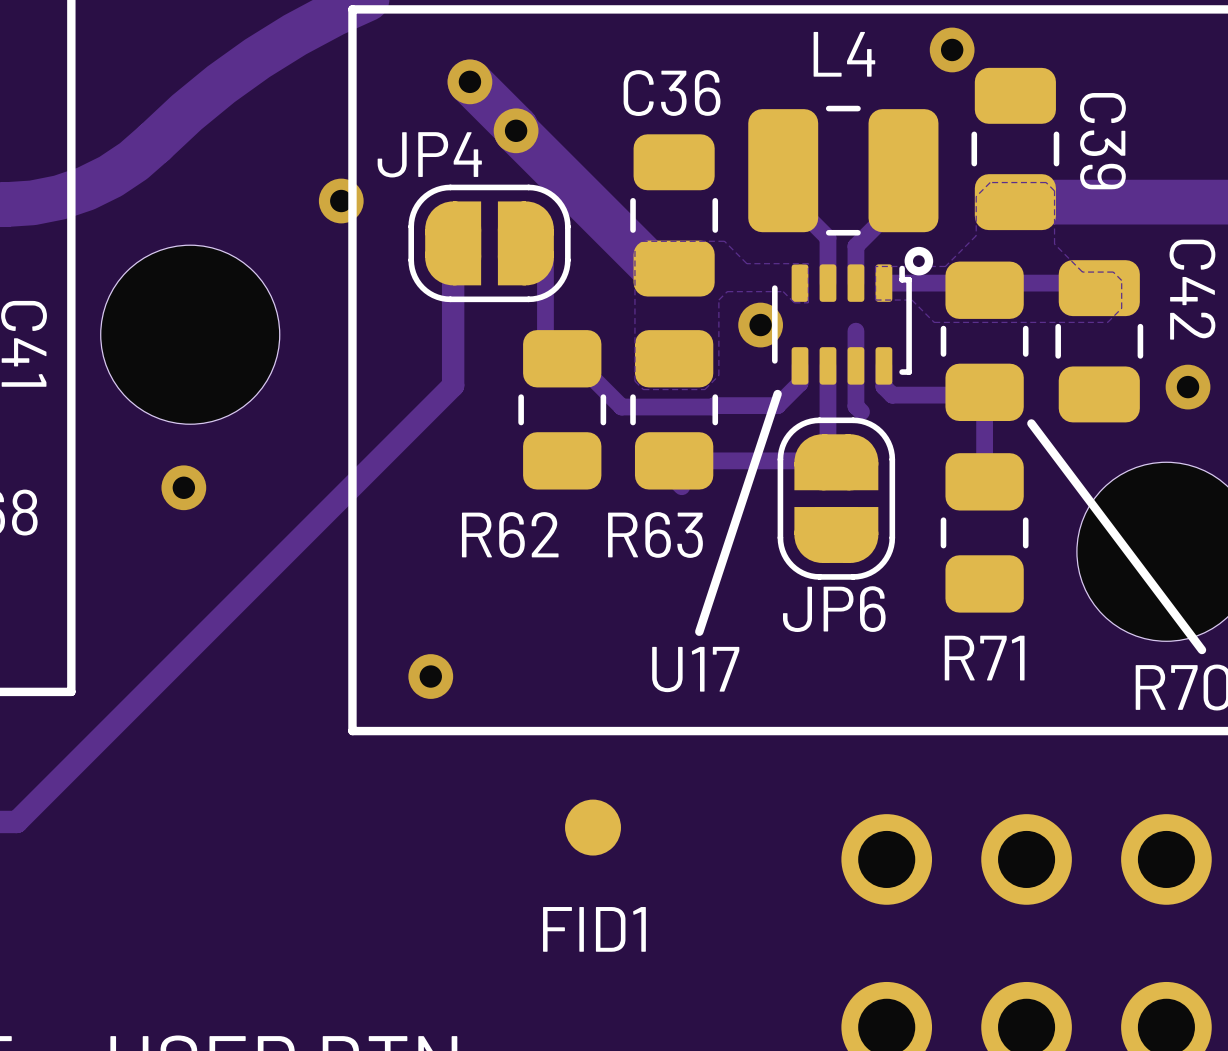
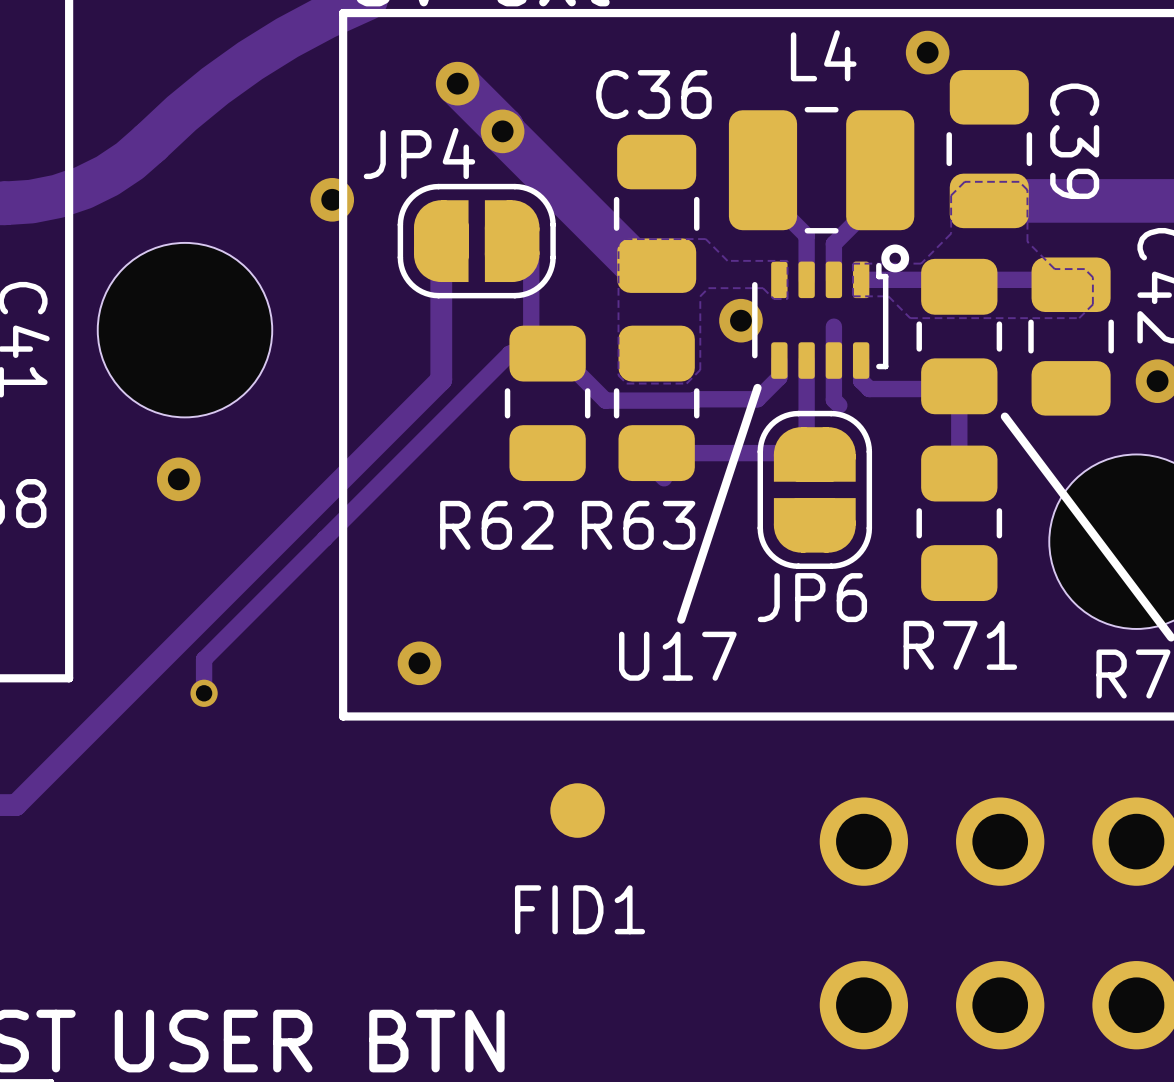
track: none -> (547, 353) (509, 353) (204, 659) (204, 693)
via: none -> (204, 693)

